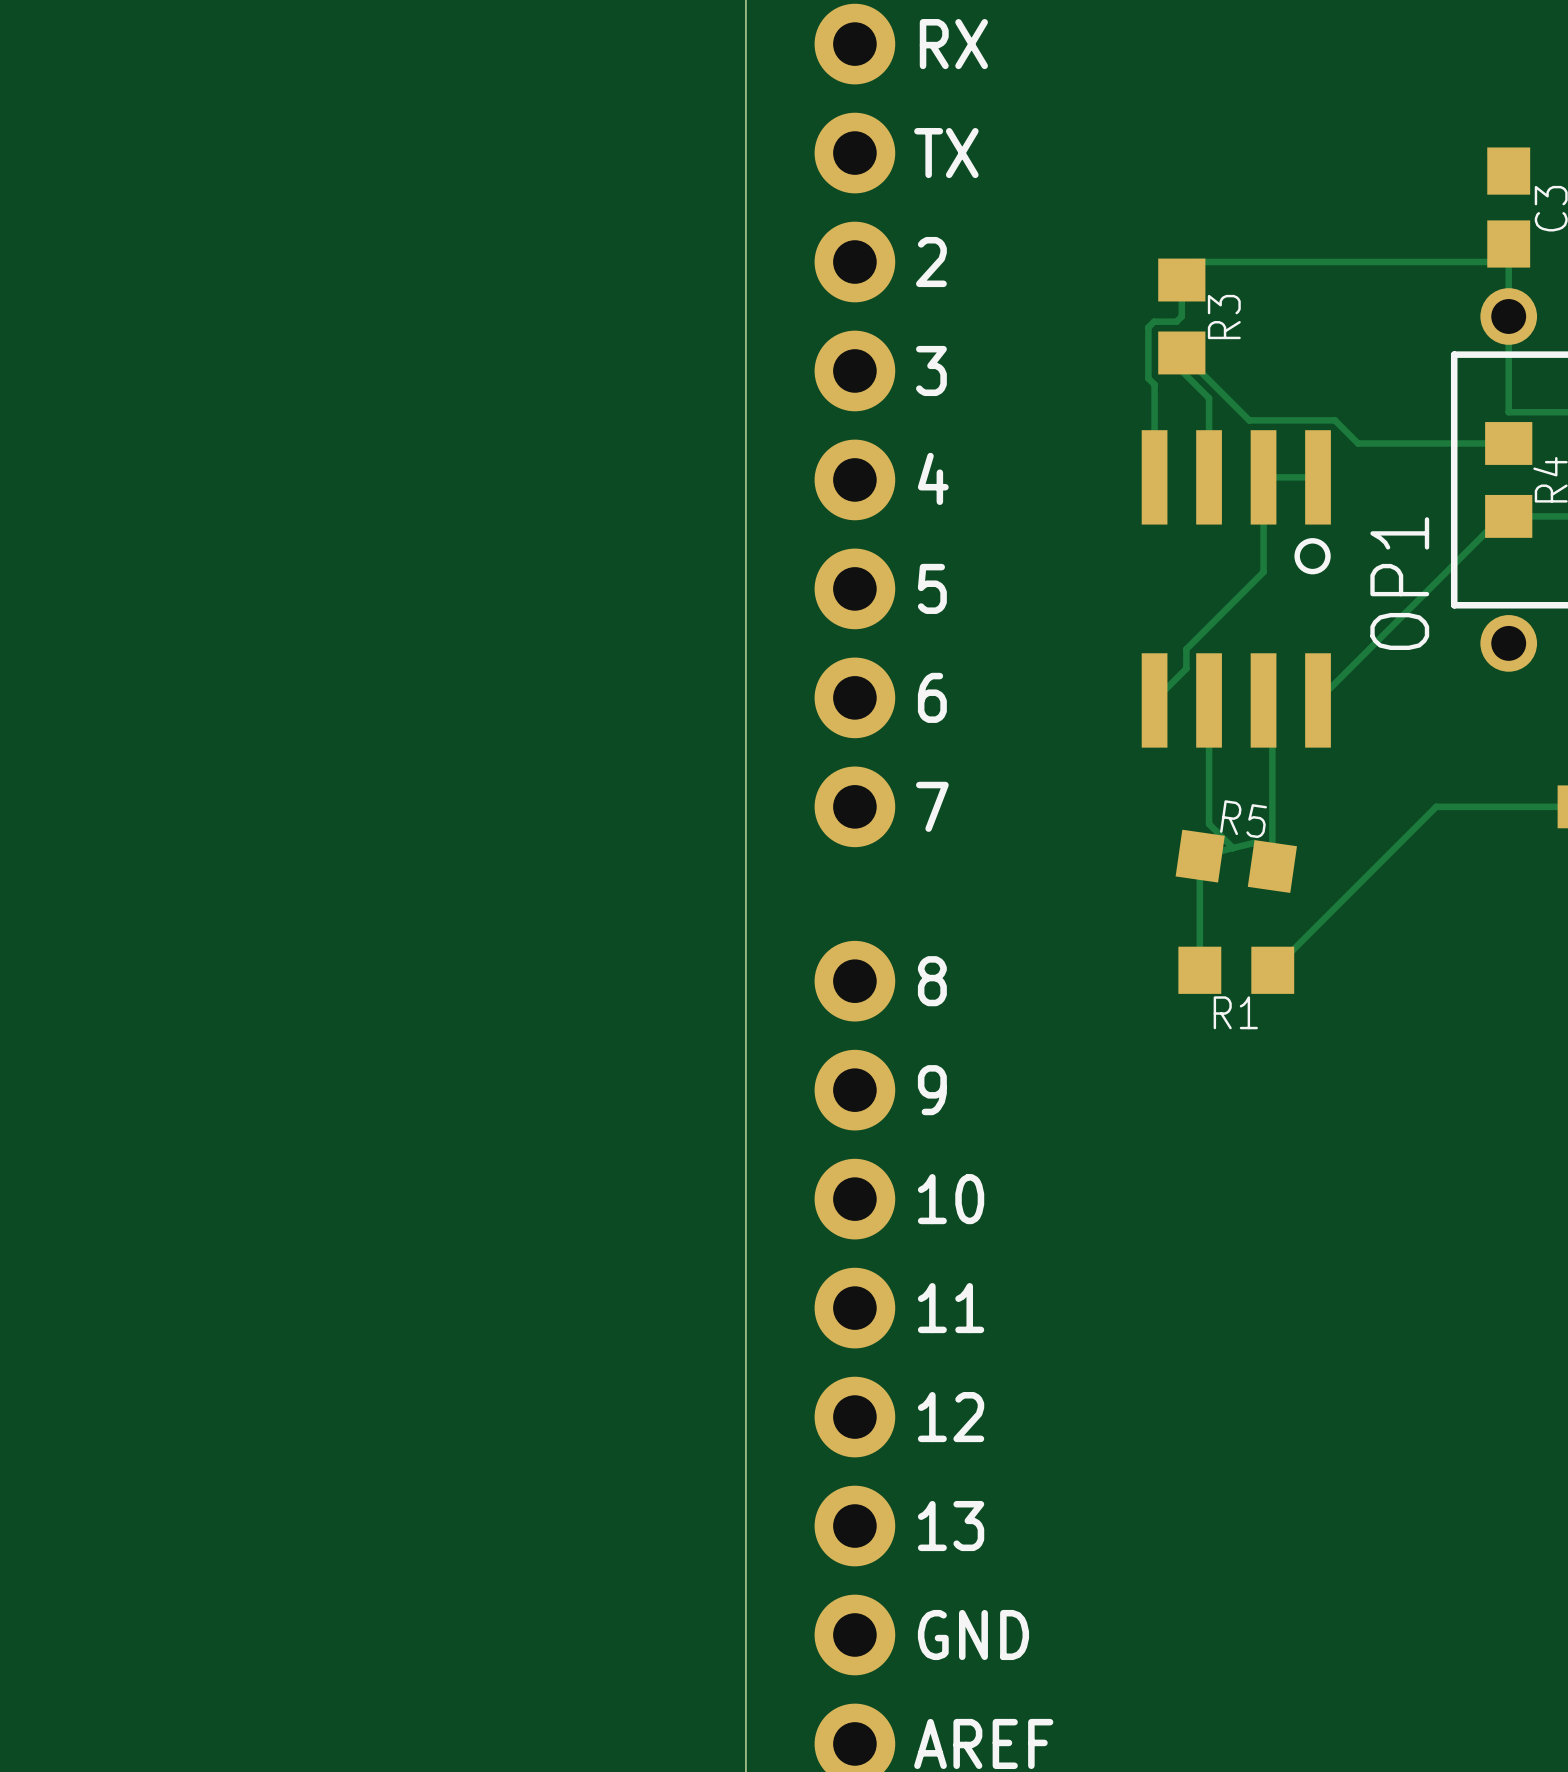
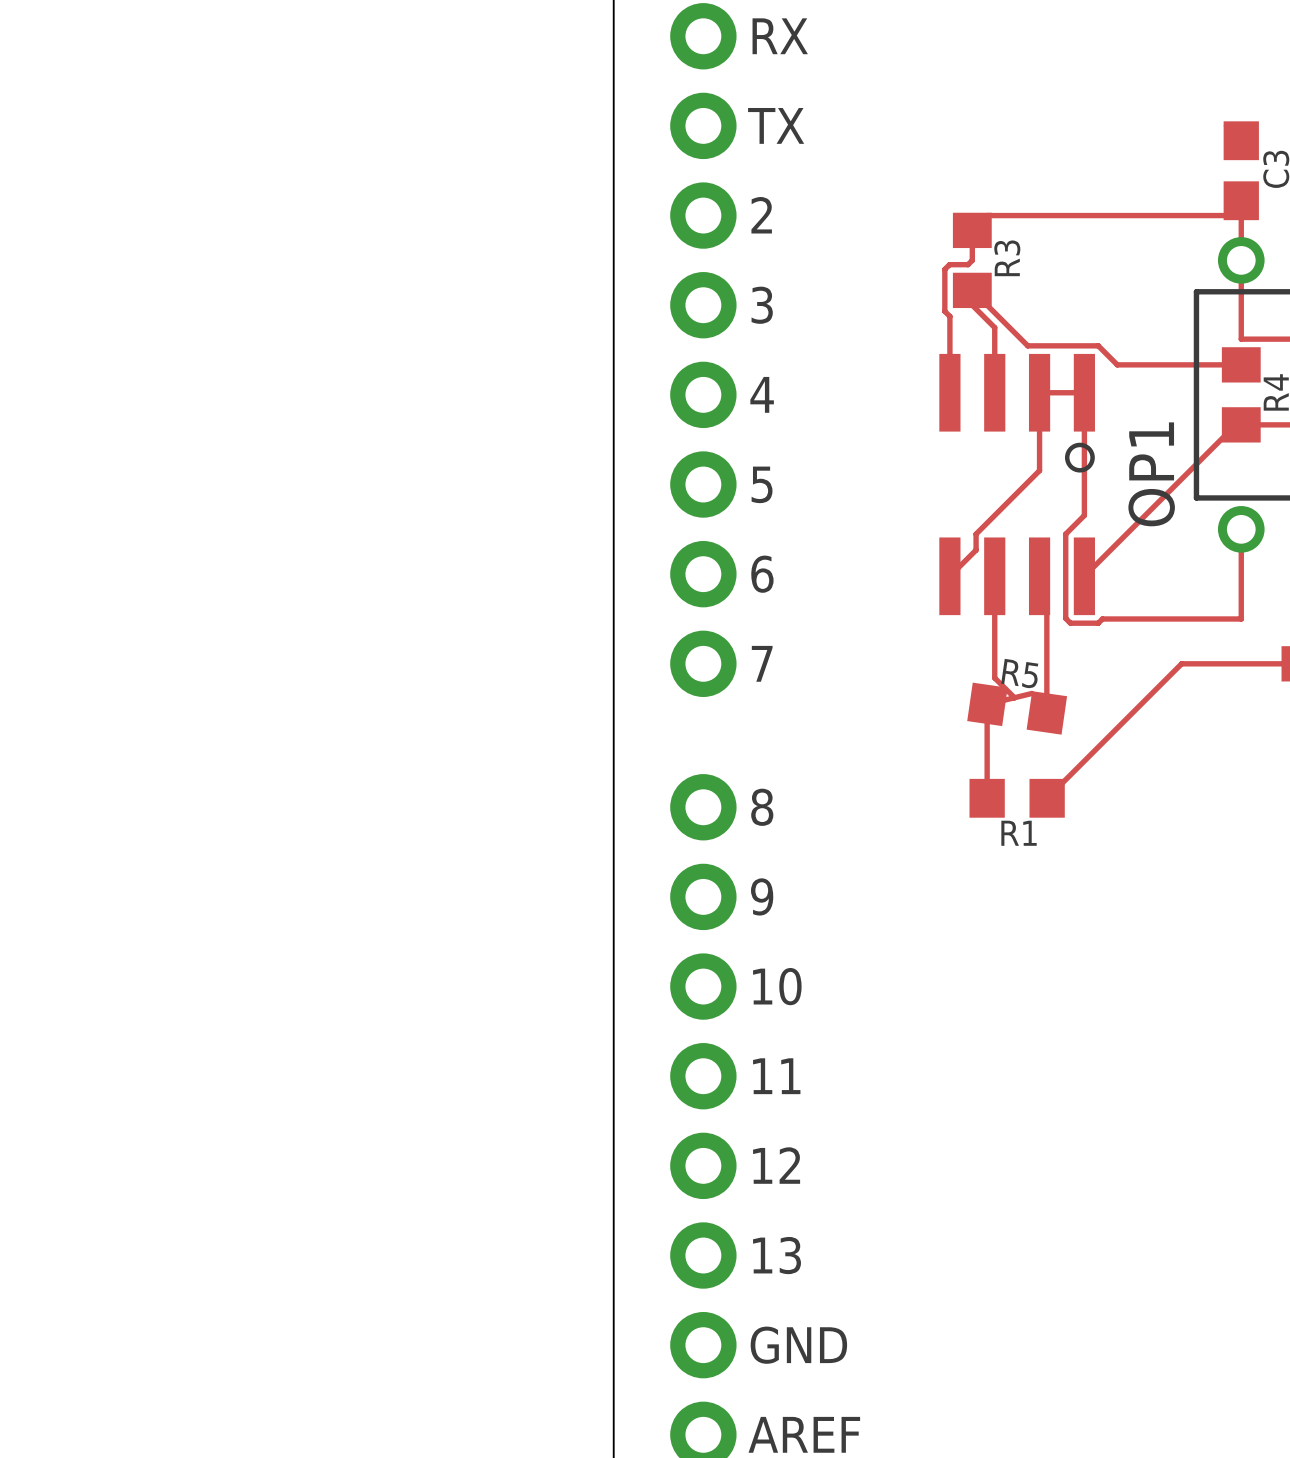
track: none -> (1084, 392) (1084, 515) (1065, 534) (1065, 618) (1070, 623) (1098, 623) (1102, 618) (1241, 618) (1241, 529)

